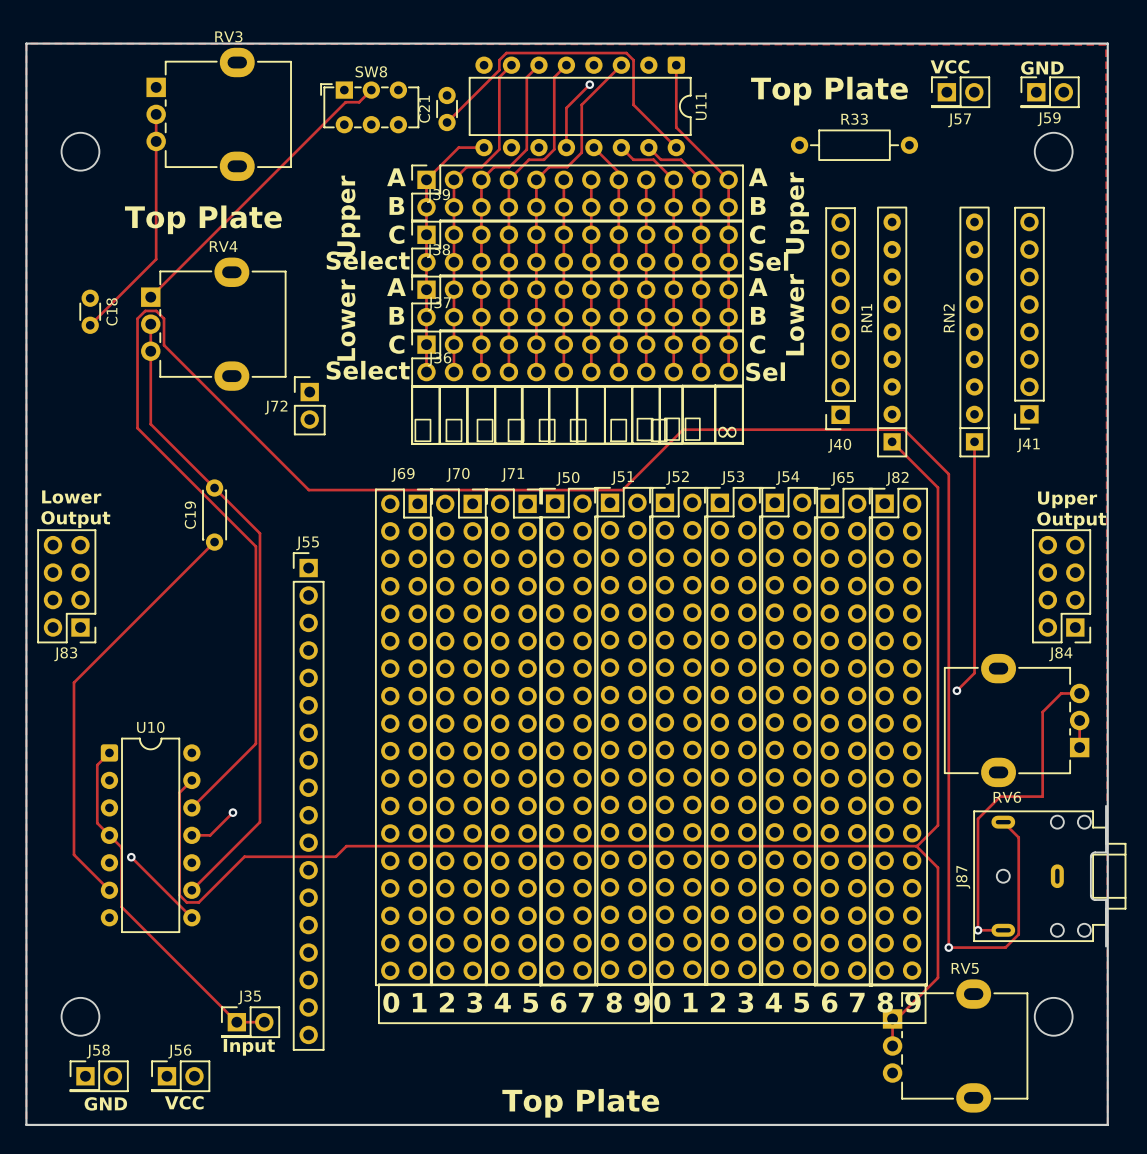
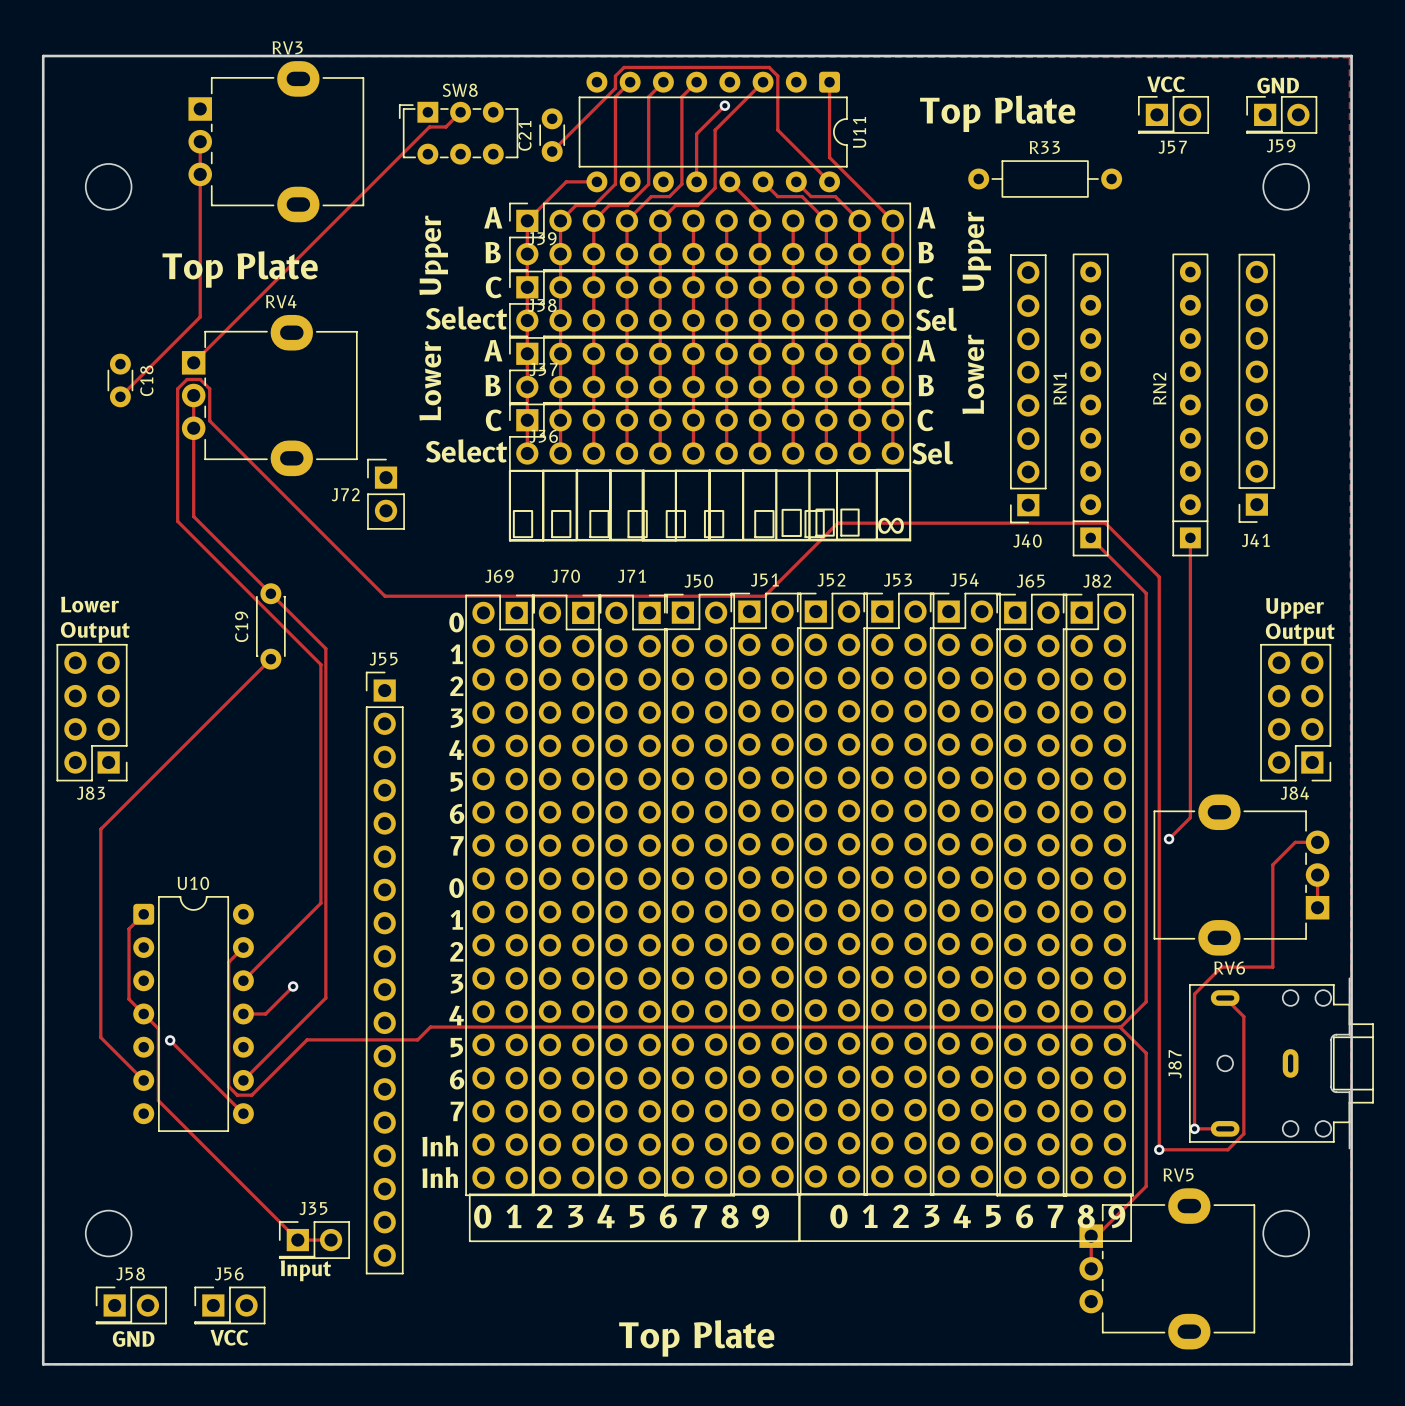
text: none -> 0 (456, 622)
text: none -> 1 (456, 654)
text: none -> 2 (456, 686)
text: none -> 3 (457, 718)
text: none -> 4 (456, 749)
text: none -> 5 (456, 782)
text: none -> 6 (457, 813)
text: none -> 7 (457, 845)
text: none -> 0 (456, 888)
text: none -> 1 (456, 919)
text: none -> 2 (456, 951)
text: none -> 3 (457, 983)
text: none -> 4 (456, 1015)
text: none -> 5 (456, 1047)
text: none -> 6 (457, 1079)
text: none -> 7 (457, 1111)
text: none -> Inh (440, 1145)
text: none -> Inh (440, 1177)

